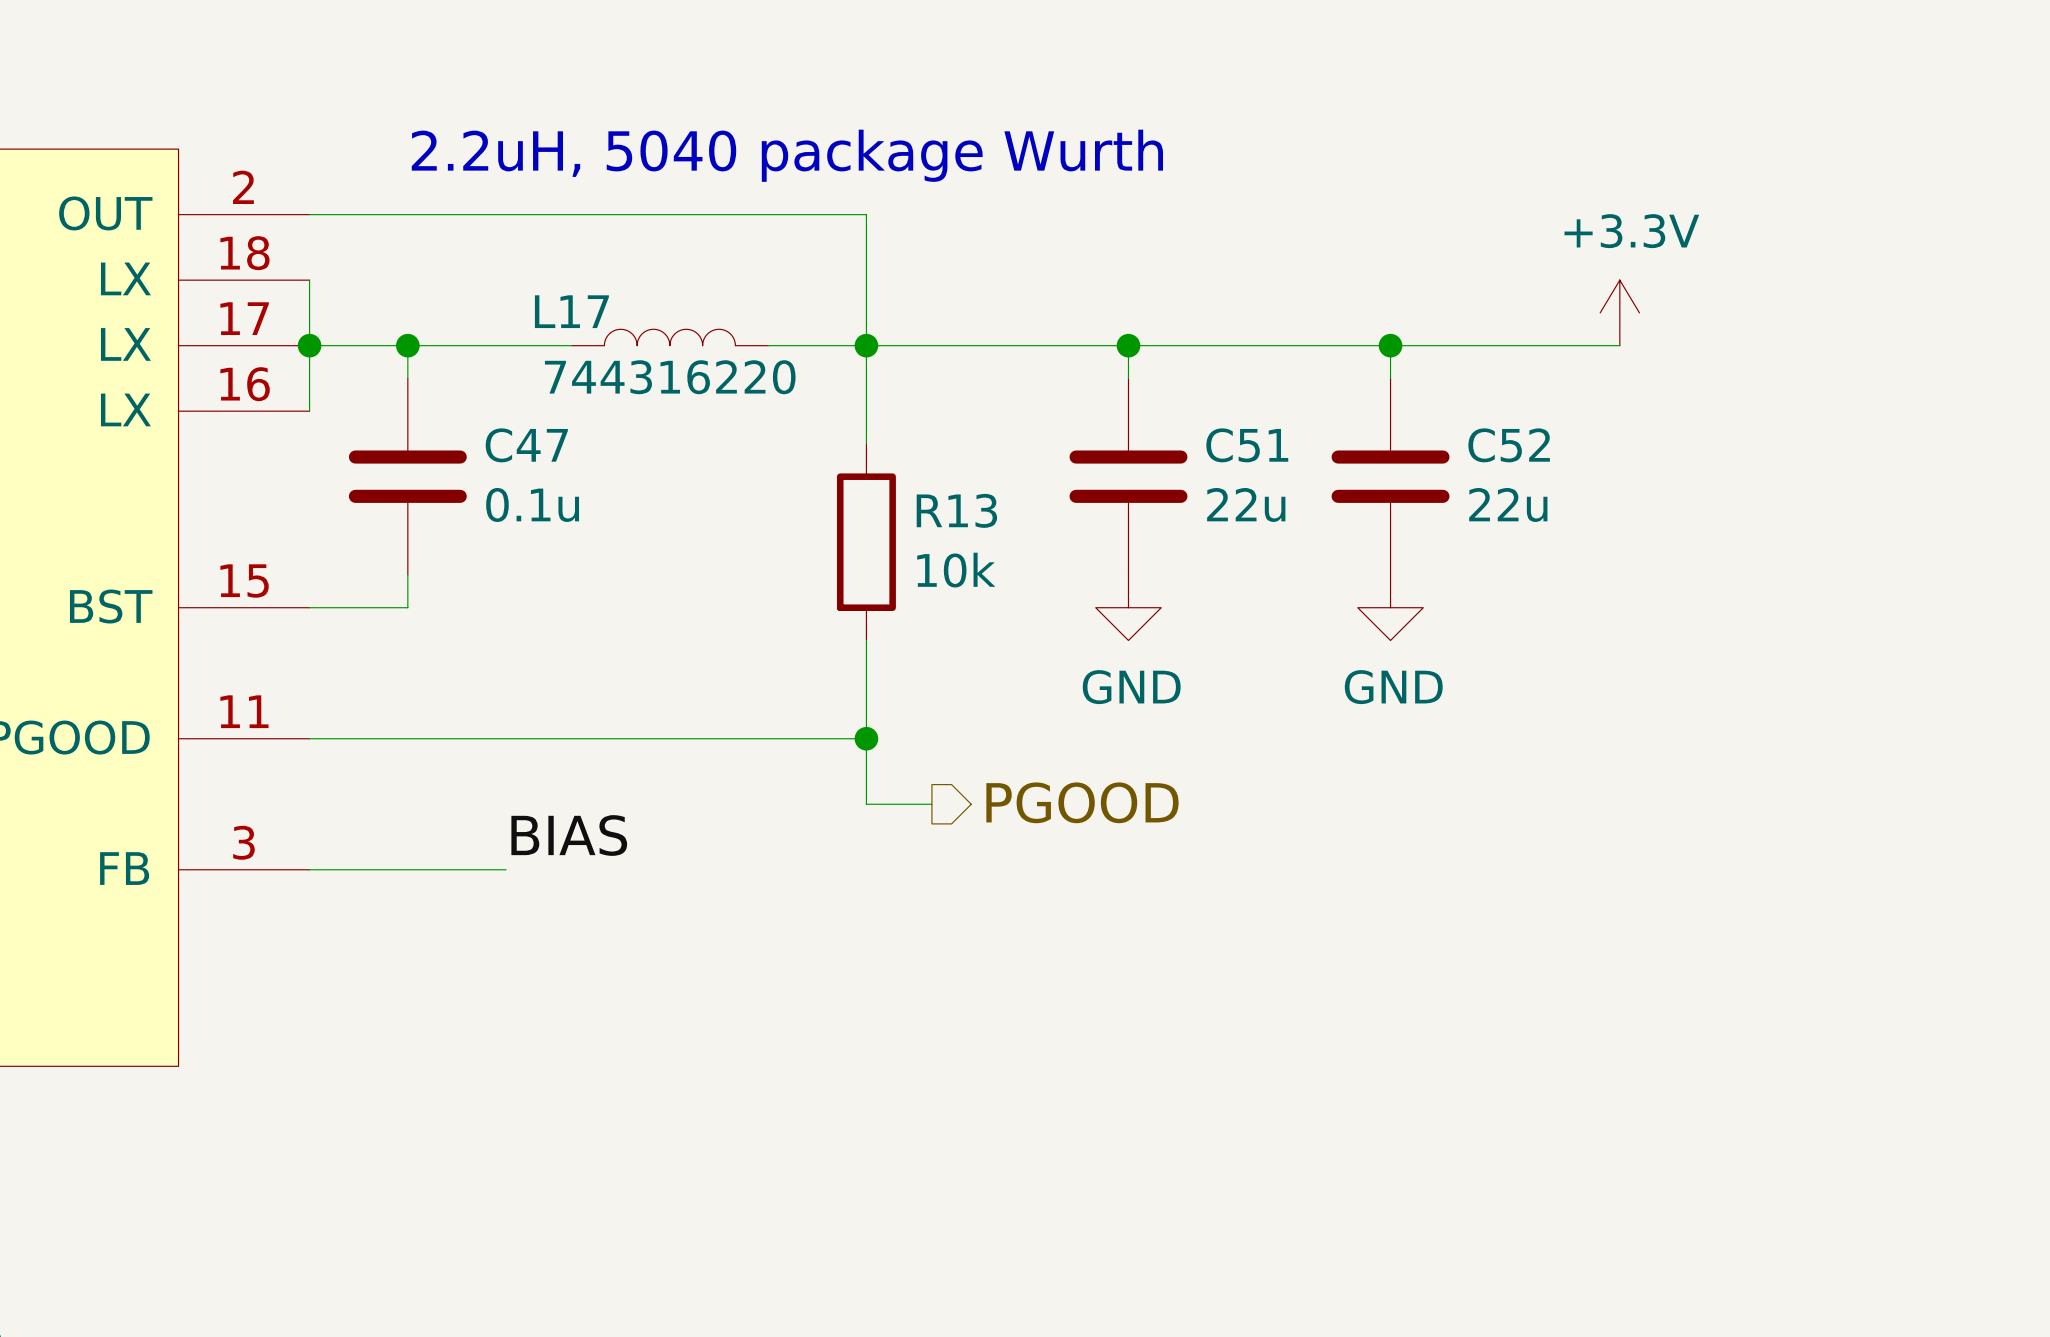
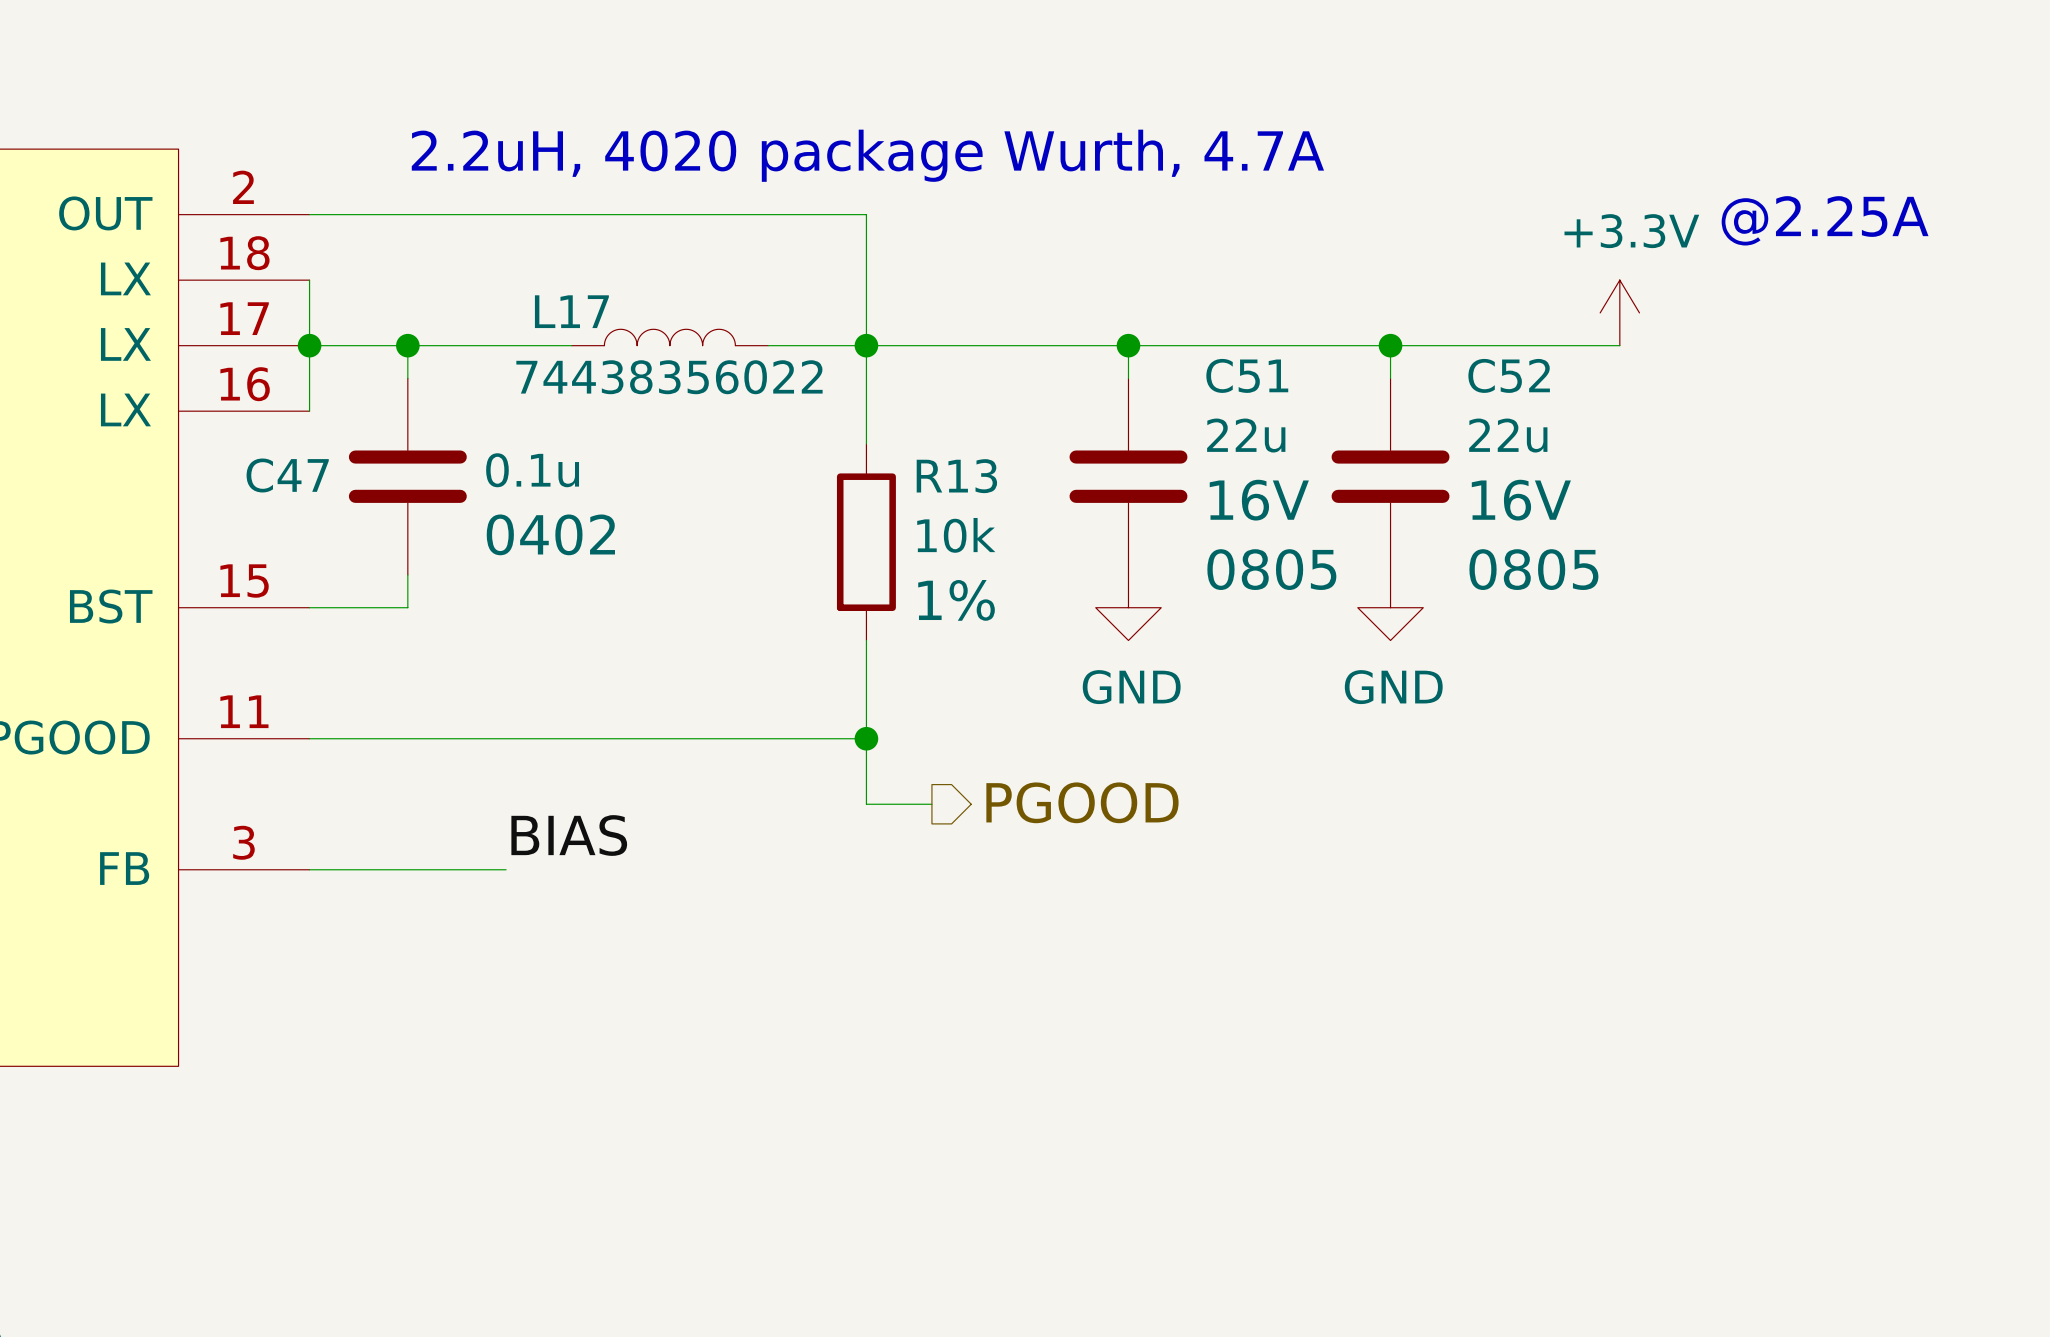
text: 2.2uH, 5040 package Wurth (787, 155) -> 2.2uH, 4020 package Wurth, 4.7A (867, 155)
text: none -> @2.25A (1825, 220)
L17 value: 744316220 (670, 377) -> 74438356022 (669, 377)
C47 name position: C47 (526, 445) -> C47 (287, 475)
C51 name position: C51 (1247, 445) -> C51 (1247, 375)
C52 name position: C52 (1509, 445) -> C52 (1509, 375)
C51 text: none -> 16V (1259, 500)
C52 text: none -> 16V (1521, 500)
C47 value position: 0.1u (532, 504) -> 0.1u (532, 470)
C51 value position: 22u (1246, 504) -> 22u (1246, 435)
C52 value position: 22u (1508, 504) -> 22u (1508, 435)
R13 name position: R13 (956, 510) -> R13 (956, 476)
C47 text: none -> 0402 (550, 534)
C51 text: none -> 0805 (1271, 569)
C52 text: none -> 0805 (1533, 569)
R13 value position: 10k (956, 570) -> 10k (956, 535)
R13 text: none -> 1% (956, 600)

